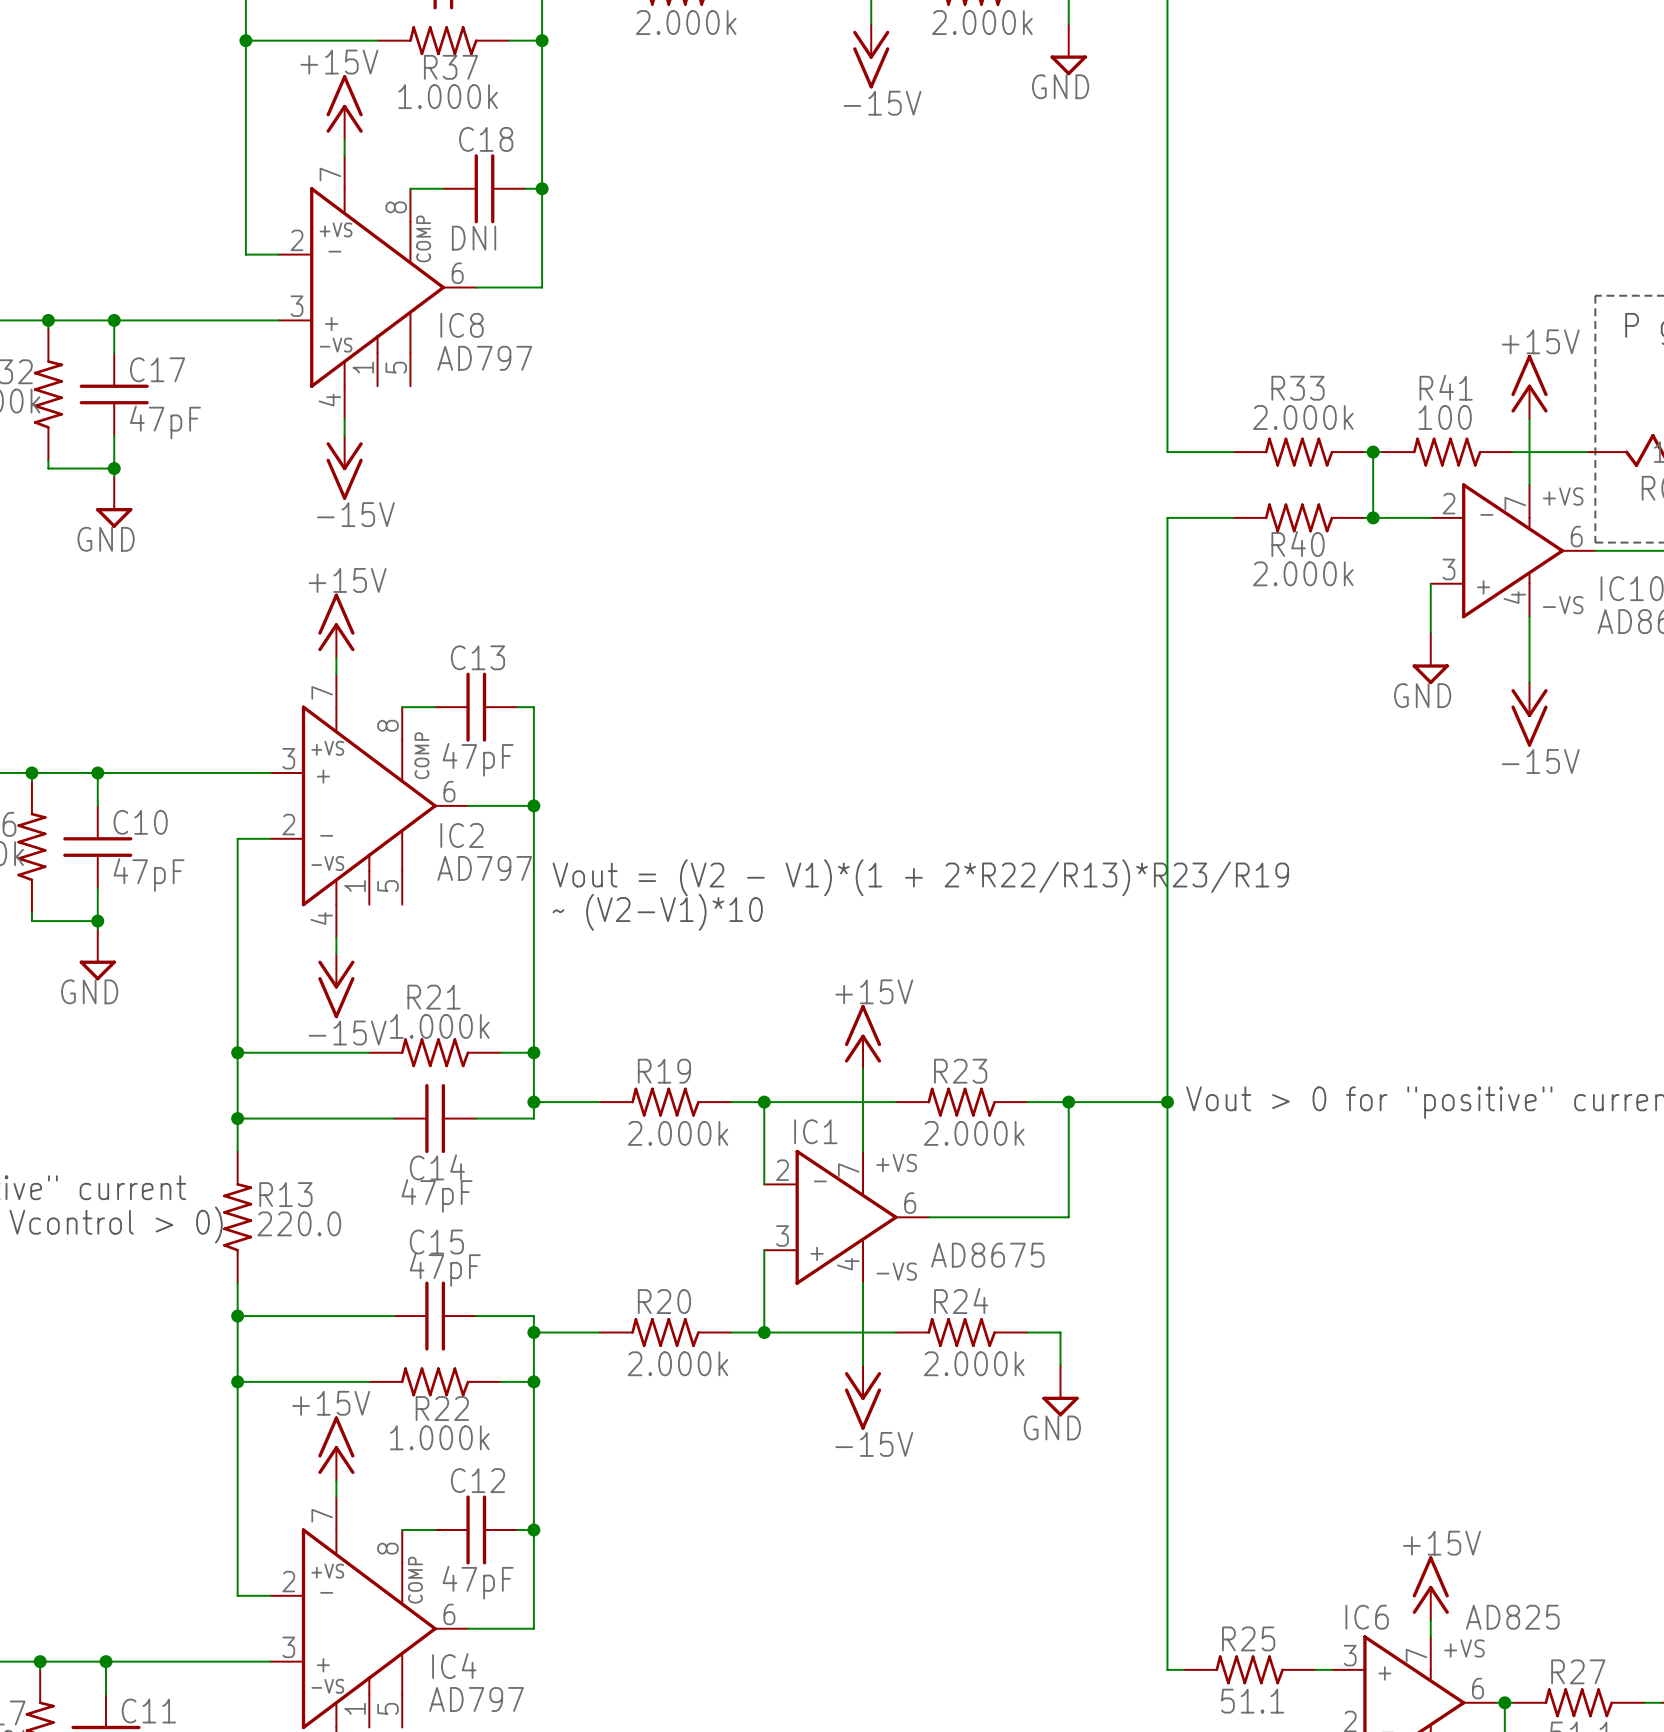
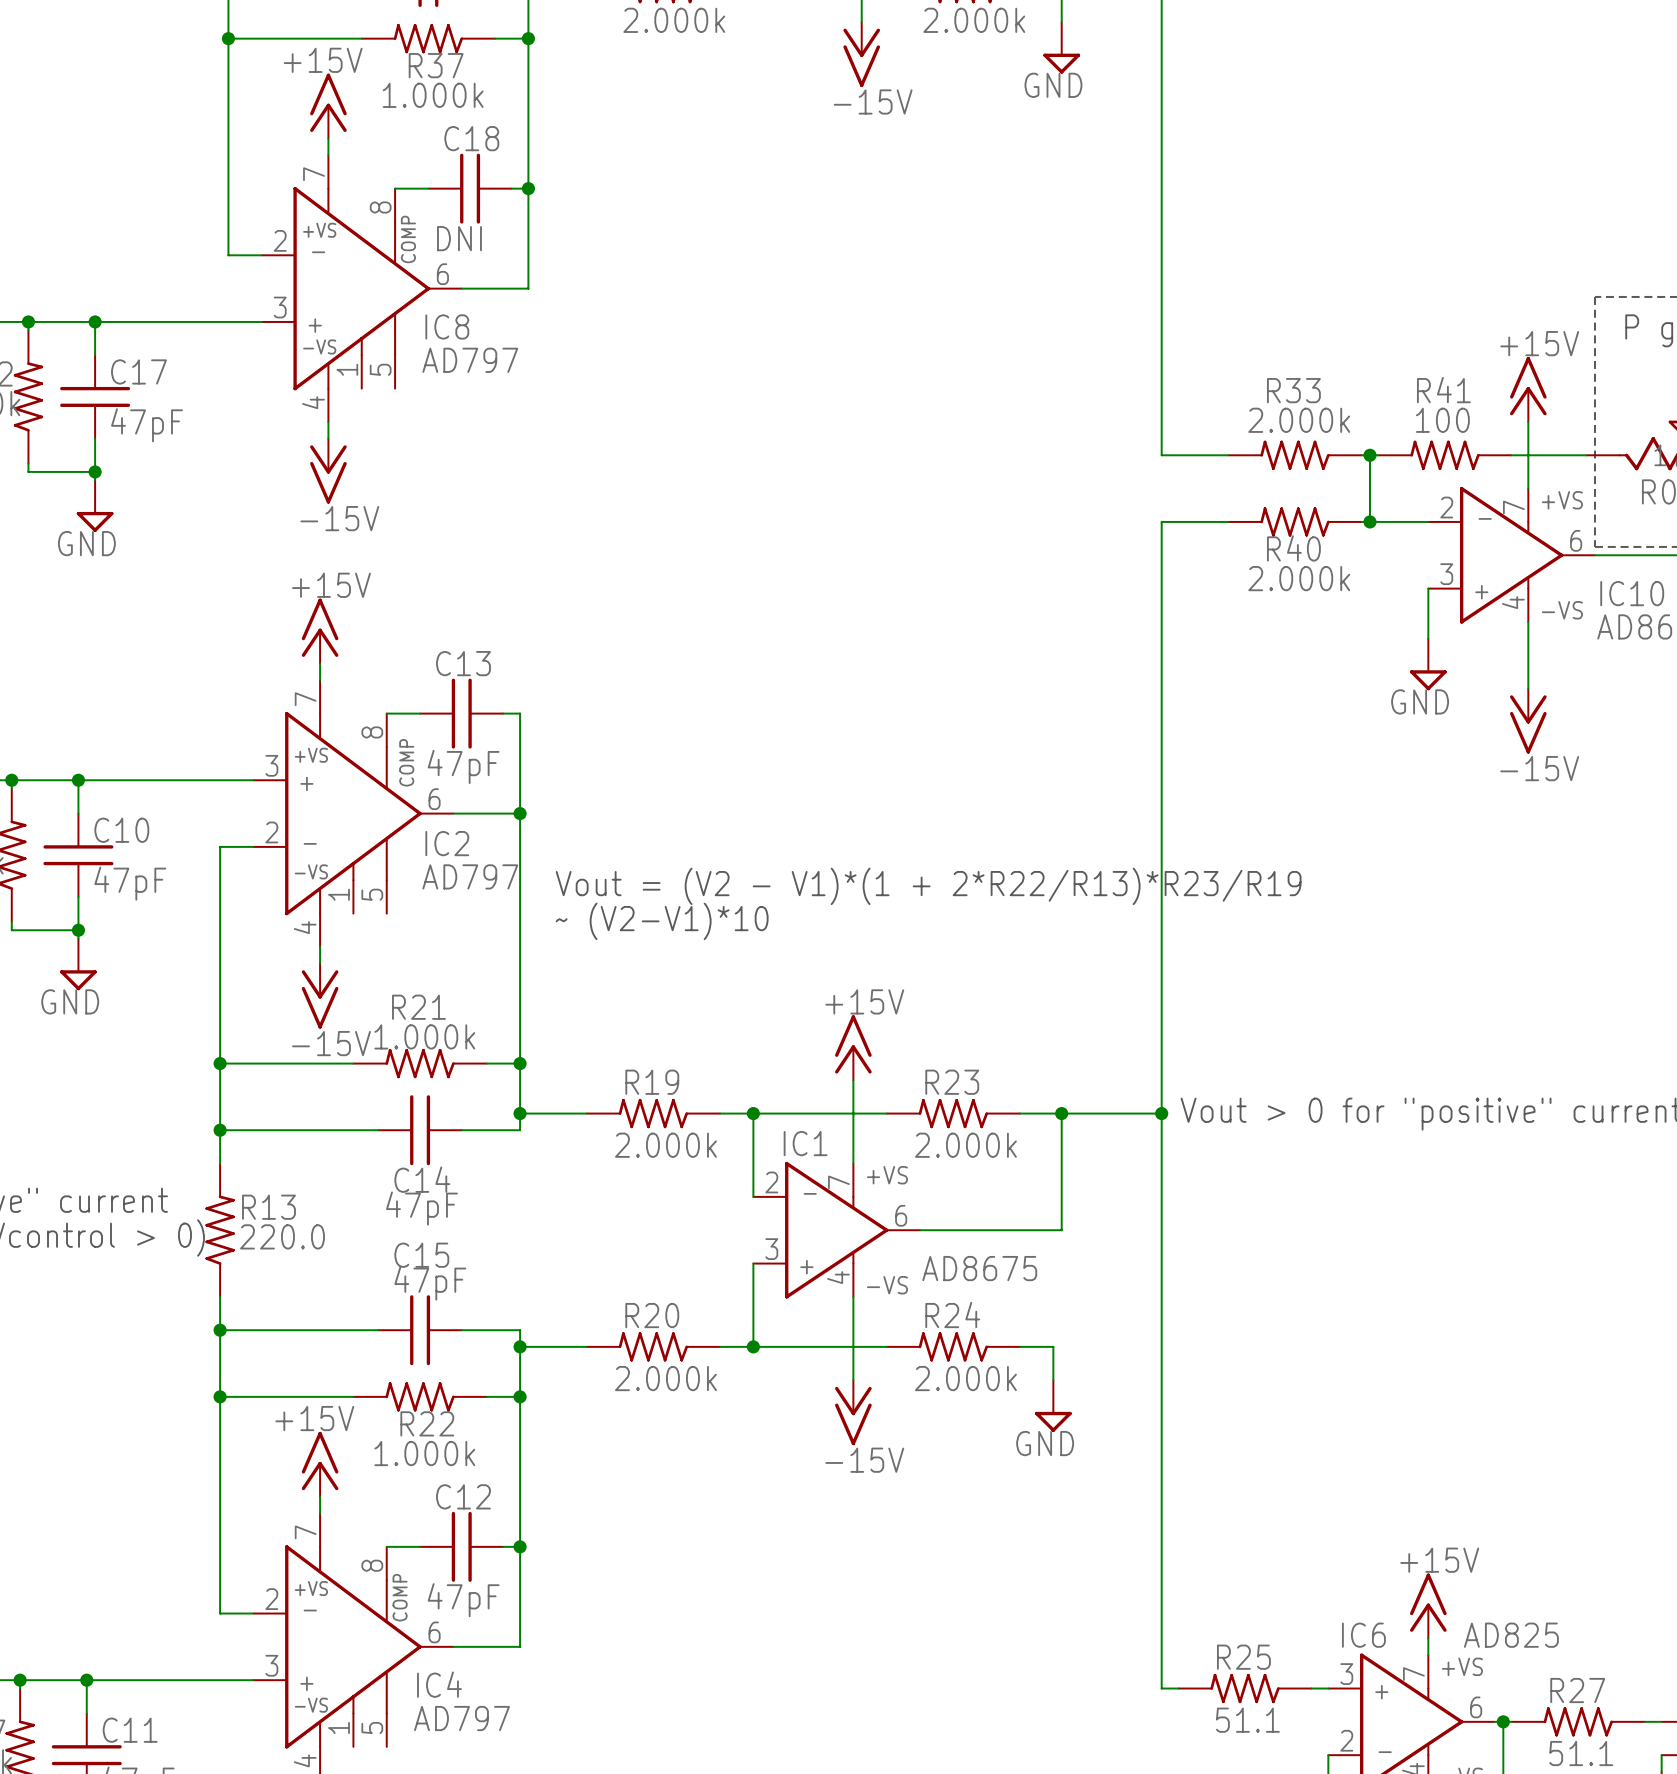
text position: Vout = (V2 - V1)*(1 + 2*R22/R13)*R23/R19 (920, 877) -> Vout = (V2 - V1)*(1 + 2*R22/R13)*R23/R19 (928, 886)
text position: ~ (V2-V1)*10 (657, 912) -> ~ (V2-V1)*10 (662, 921)

